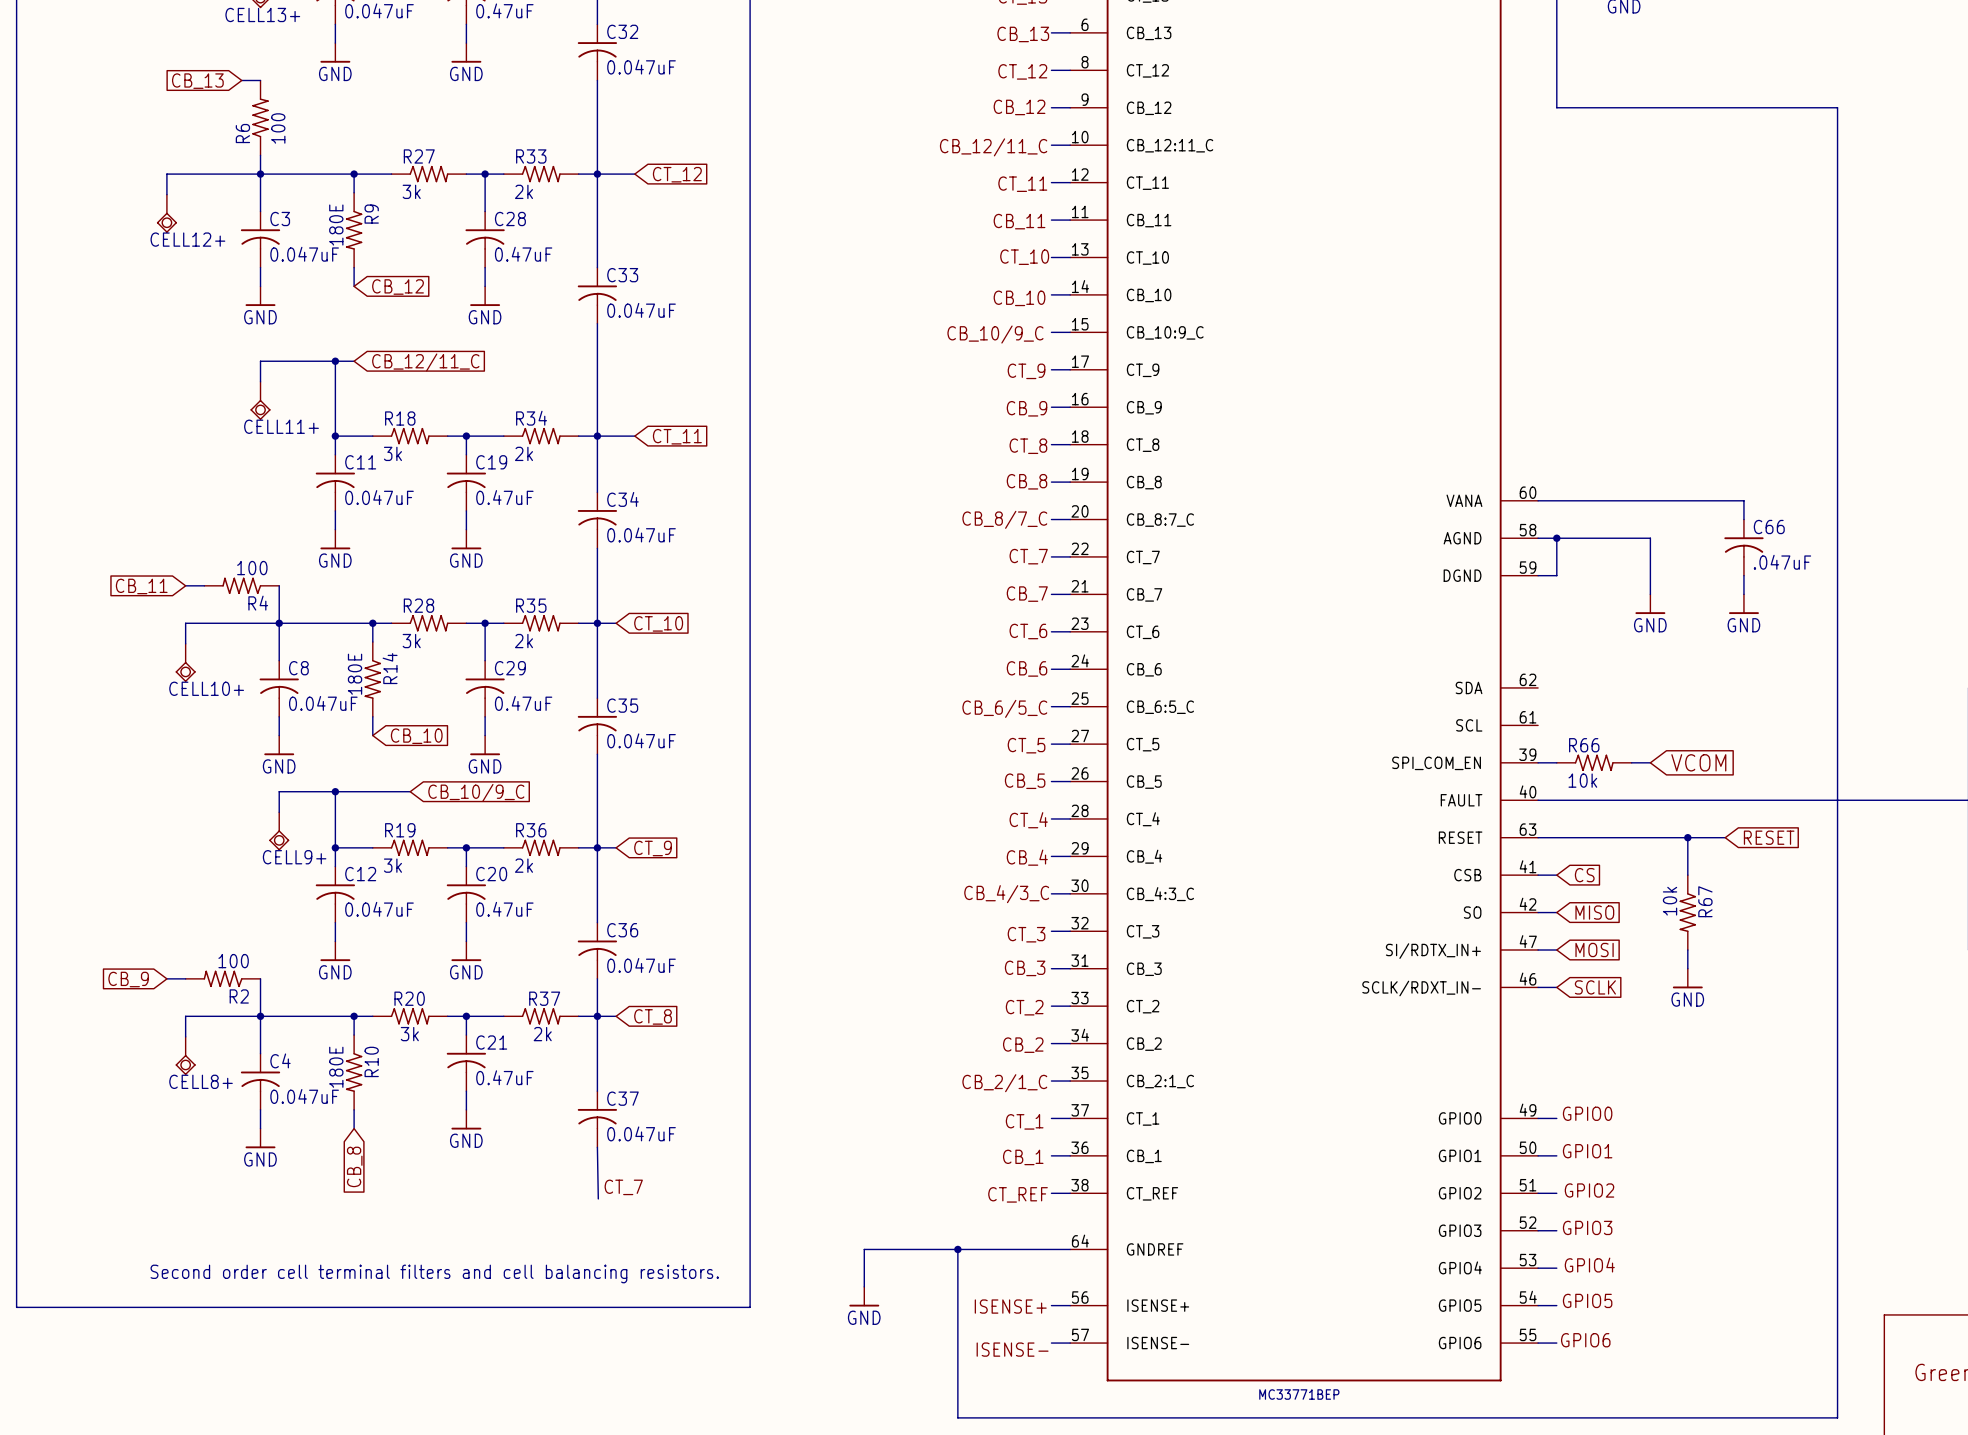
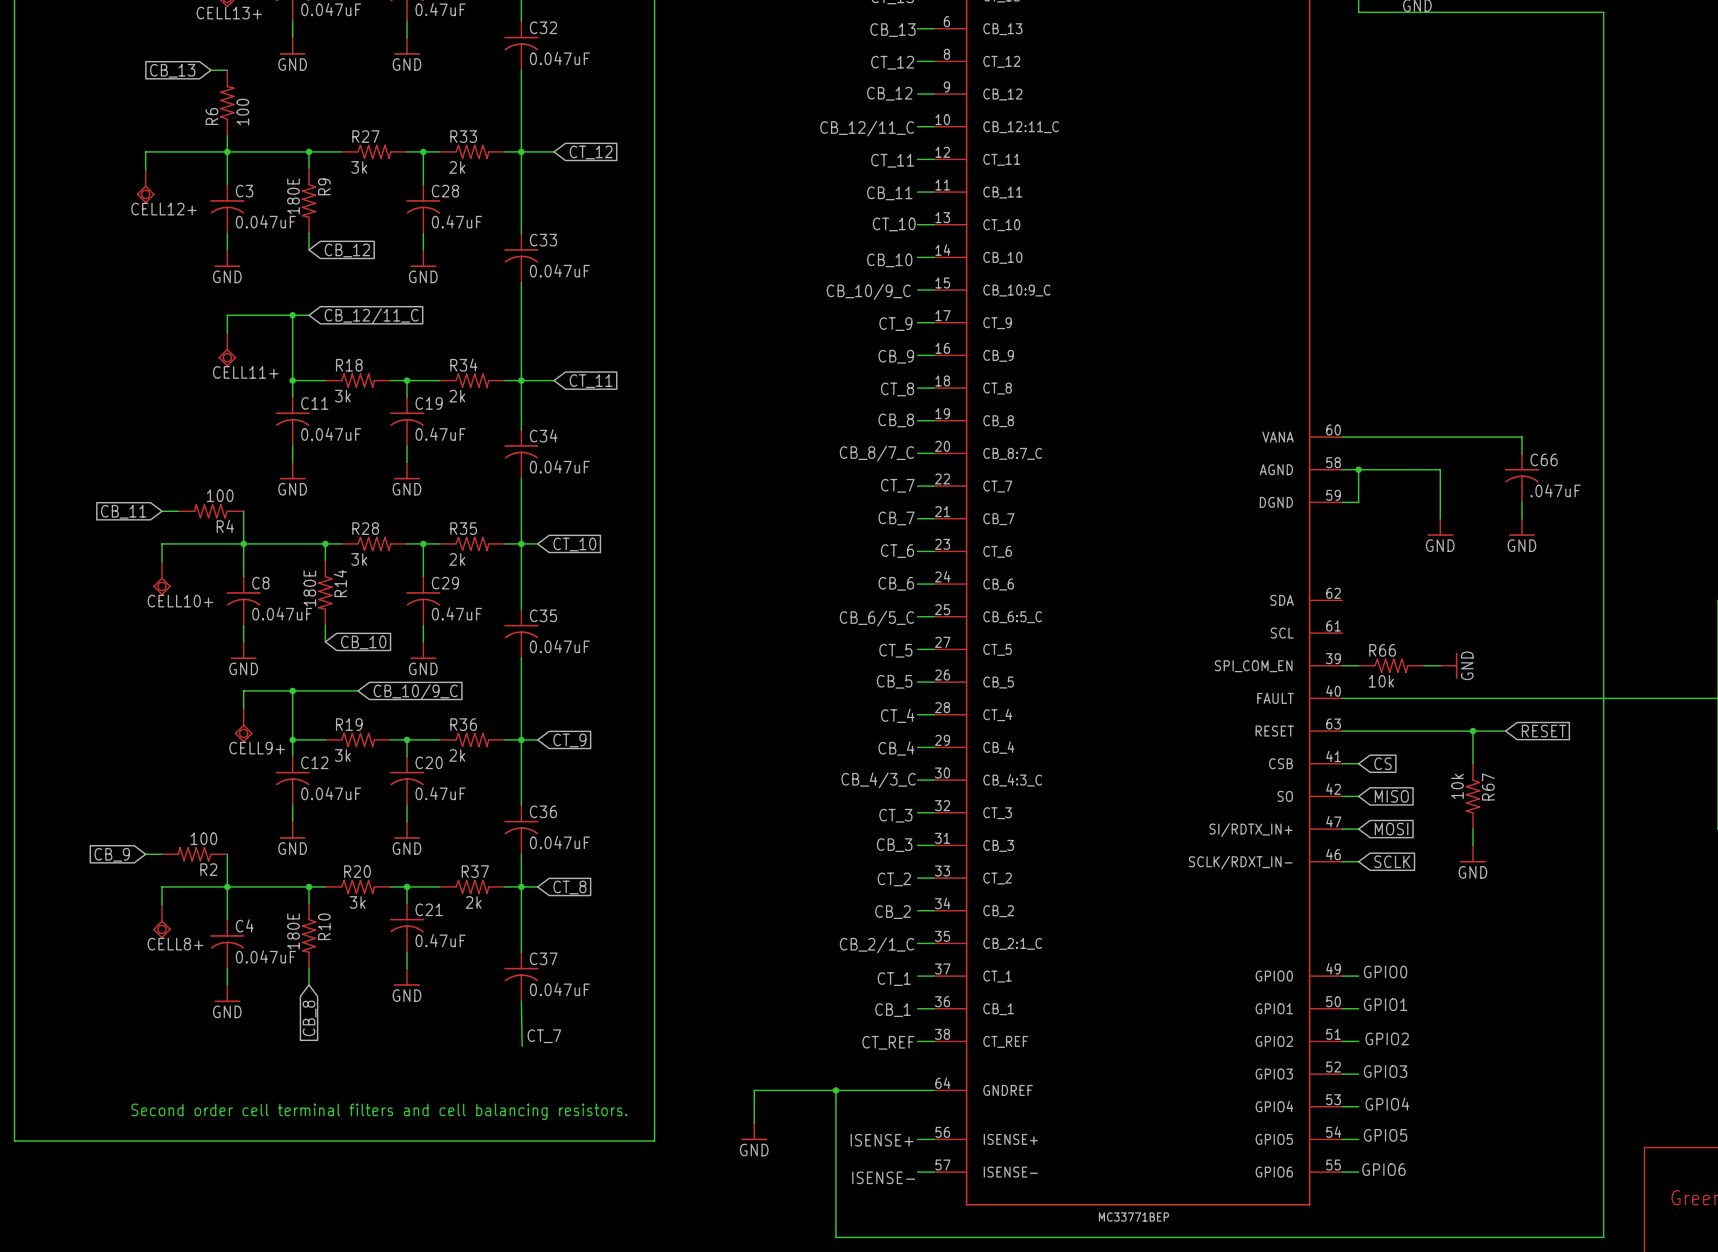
wire: (1556, 14) (1556, 107) (1837, 107) -> (1358, 12) (1603, 12) (1603, 94)
power symbol: none -> GND (1448, 665)
global label: VCOM (1698, 762) -> none

